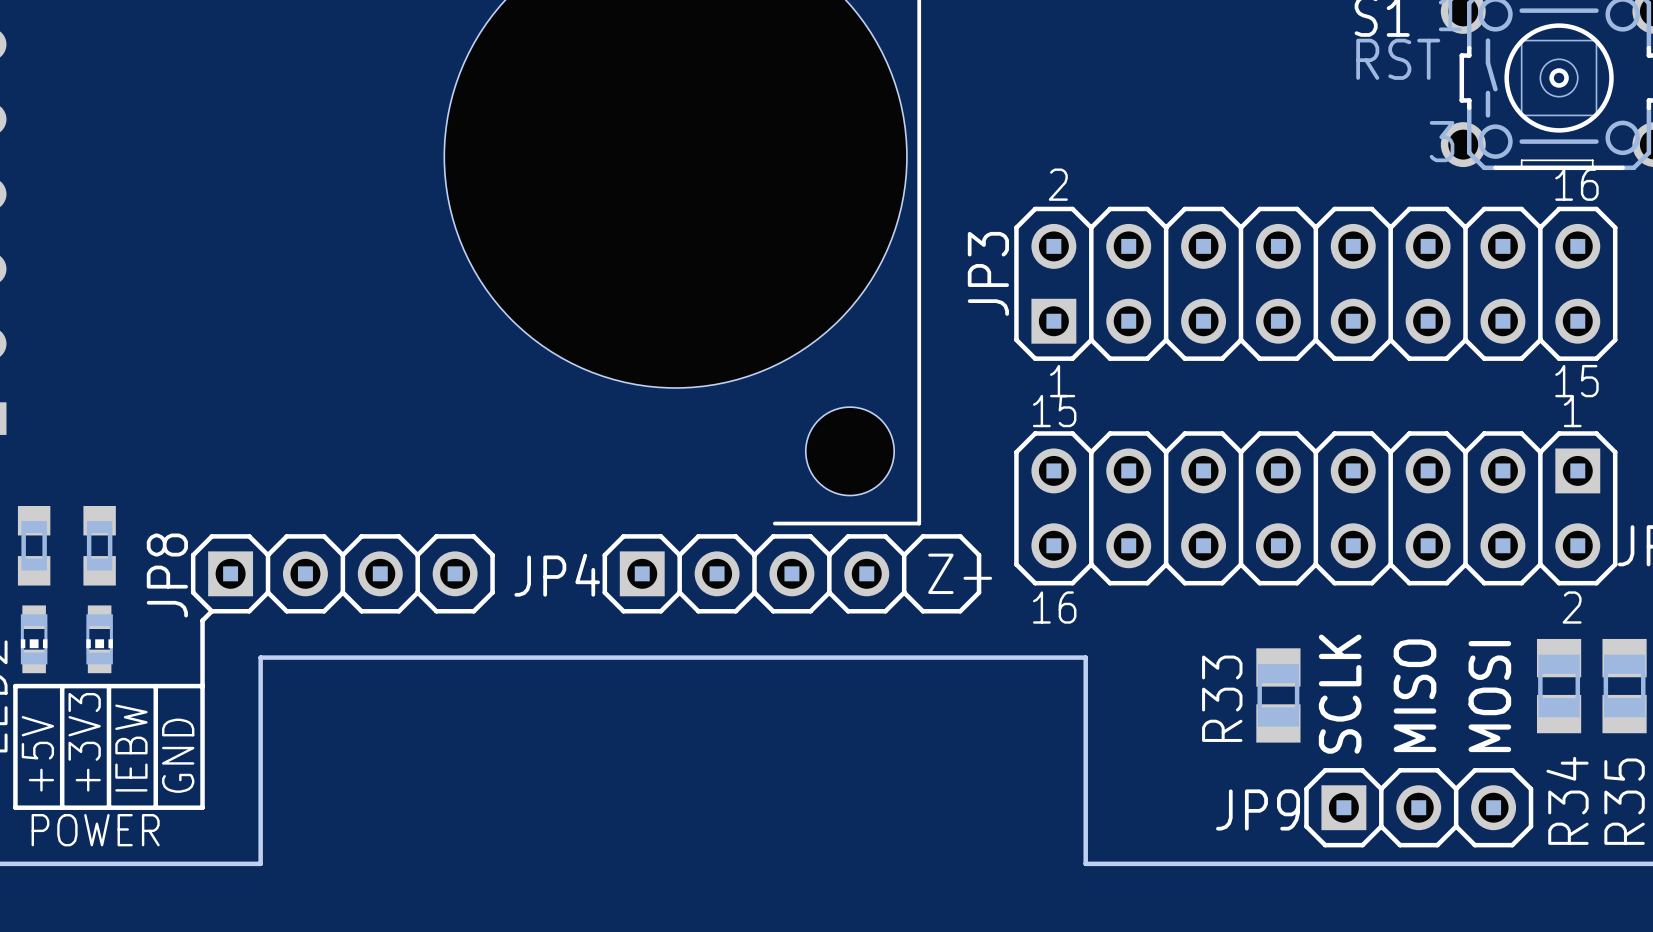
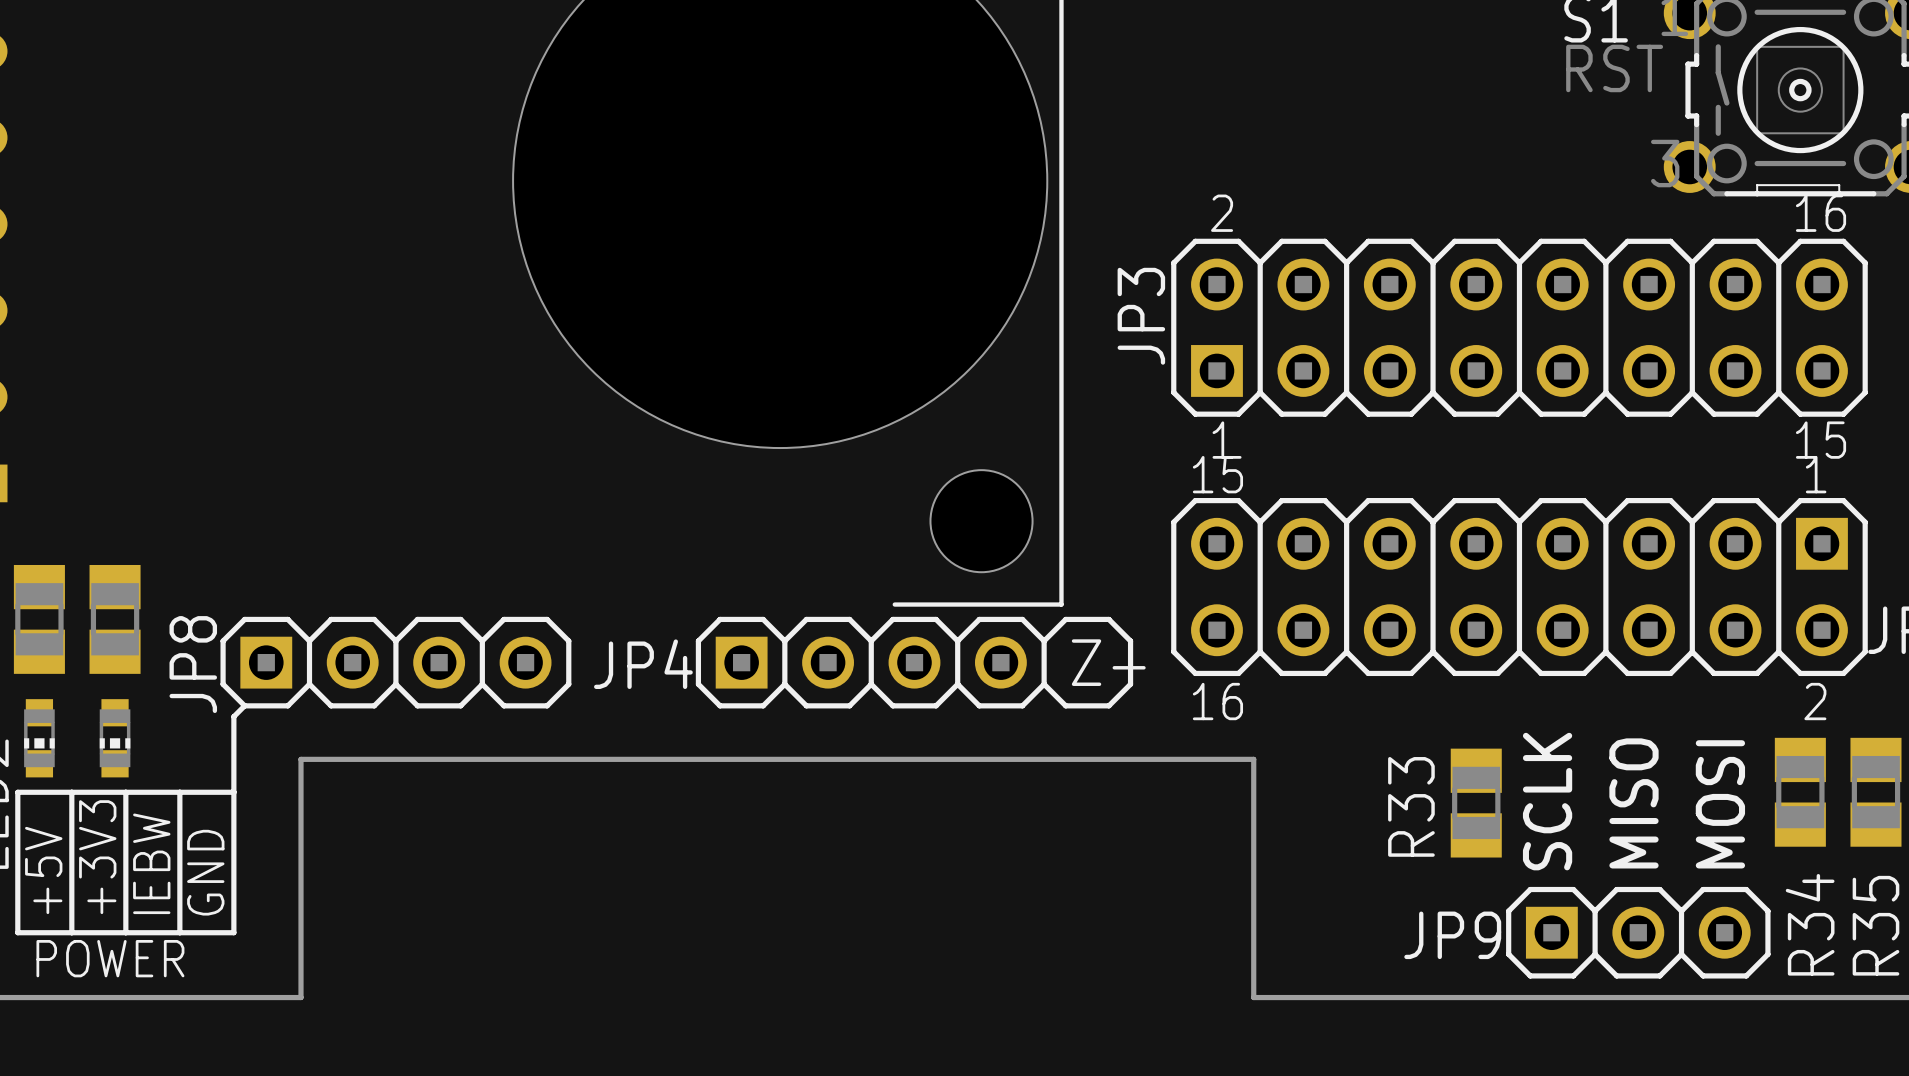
part footprint: [17, 505, 51, 586] -> [13, 564, 65, 674]
part footprint: [83, 505, 116, 586] -> [89, 564, 141, 674]

